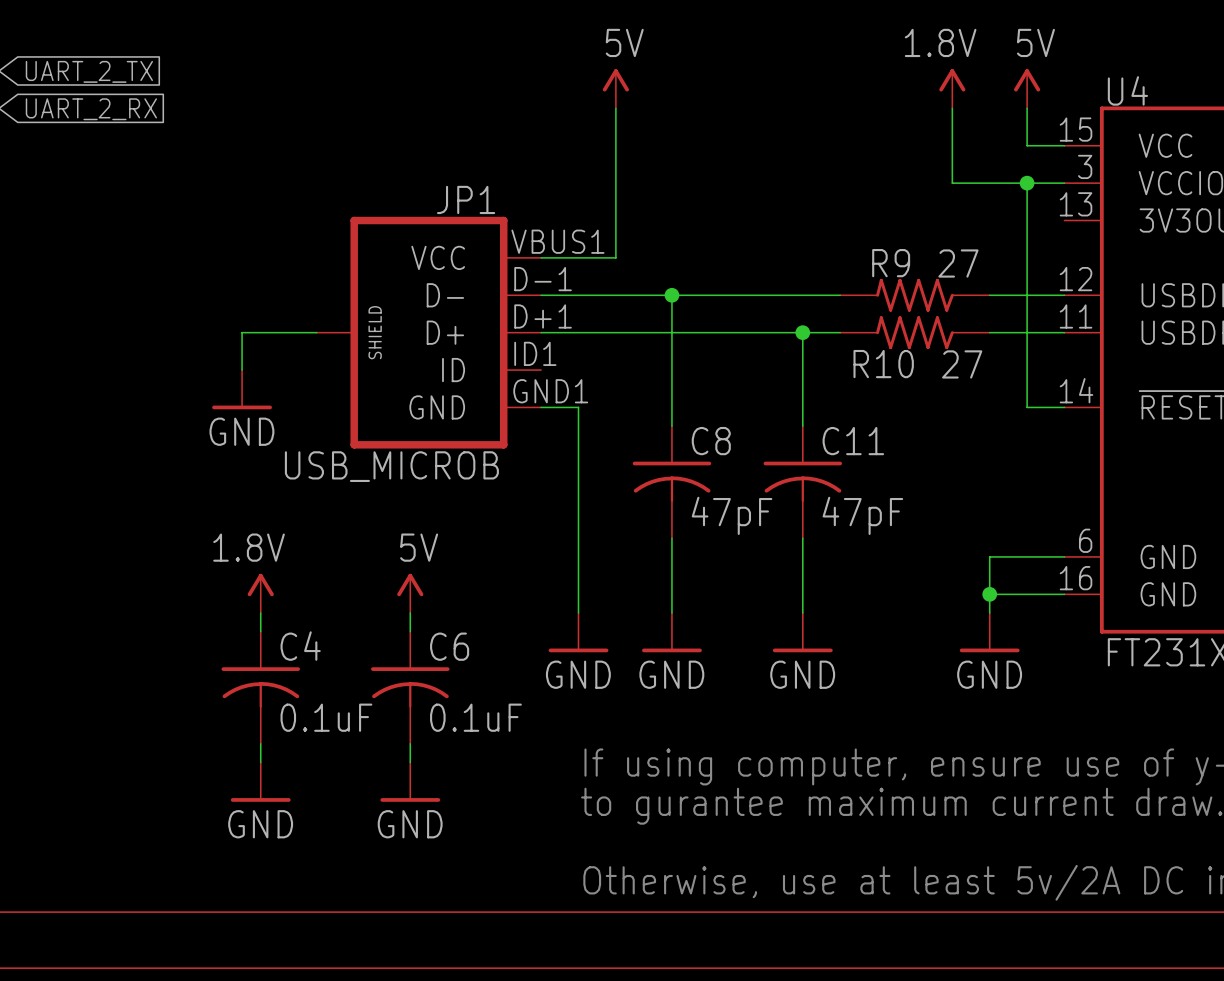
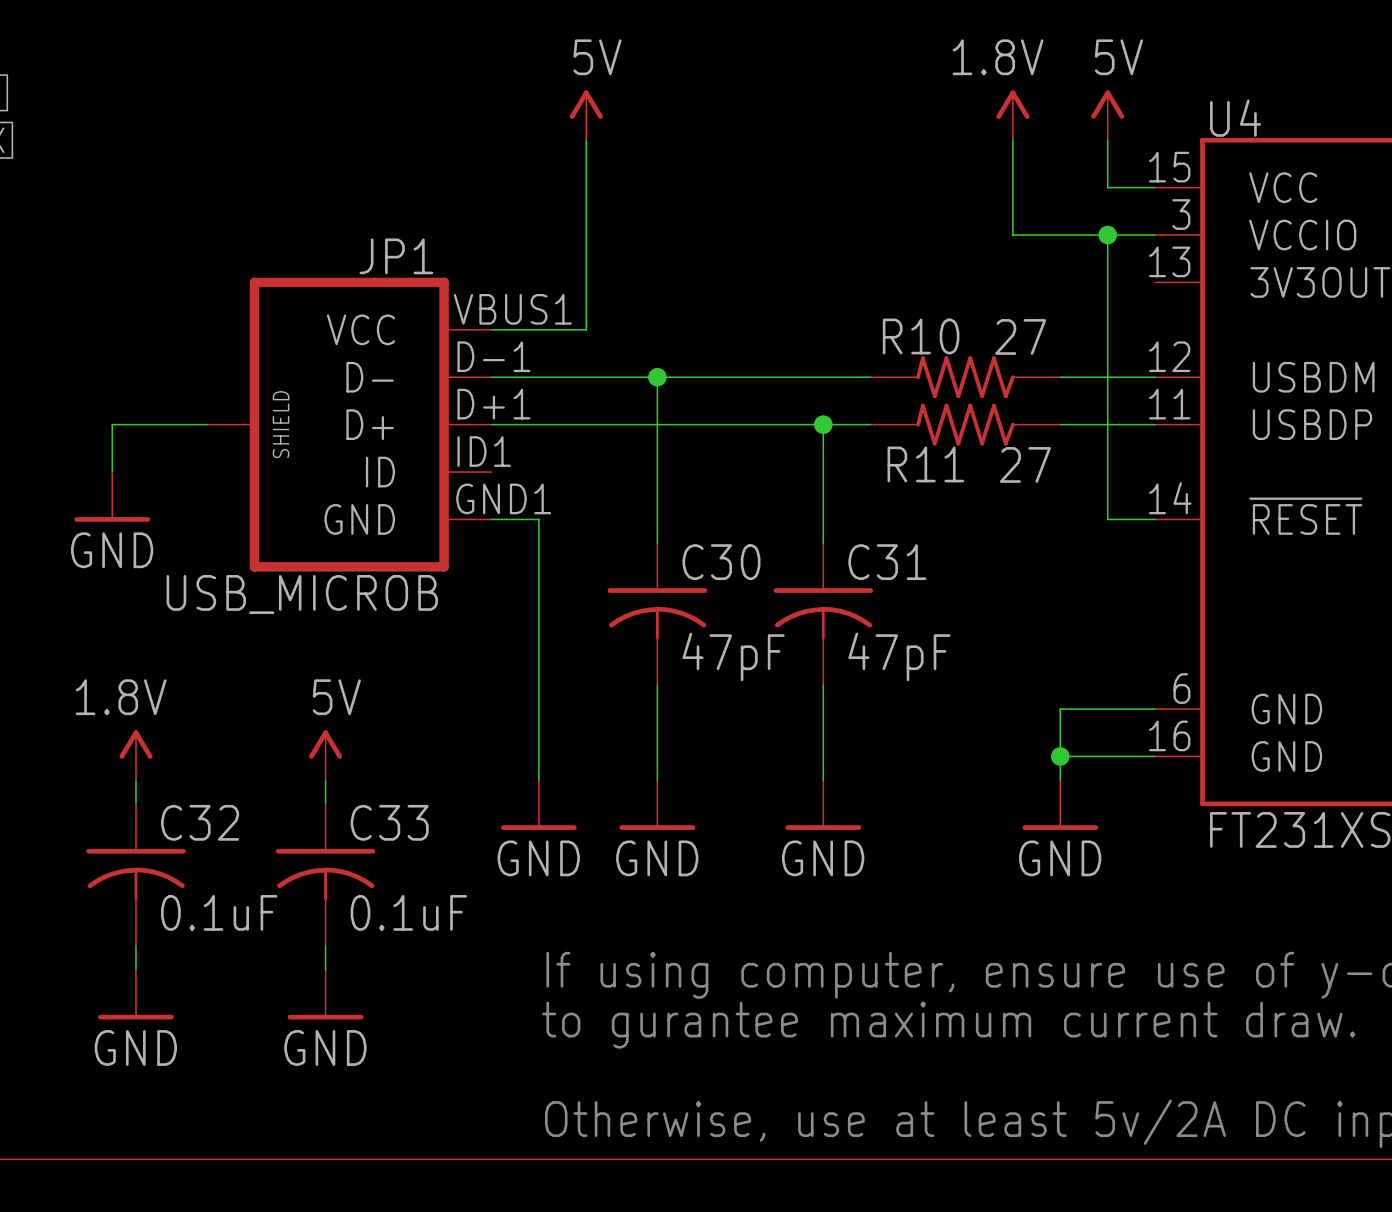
R9 name: R9 (891, 263) -> R10 (921, 336)
R10 name: R10 (883, 364) -> R11 (925, 464)
C8 name: C8 (711, 441) -> C30 (721, 562)
C11 name: C11 (853, 441) -> C31 (887, 562)
C4 name: C4 (300, 646) -> C32 (200, 822)
C6 name: C6 (449, 646) -> C33 (389, 822)

